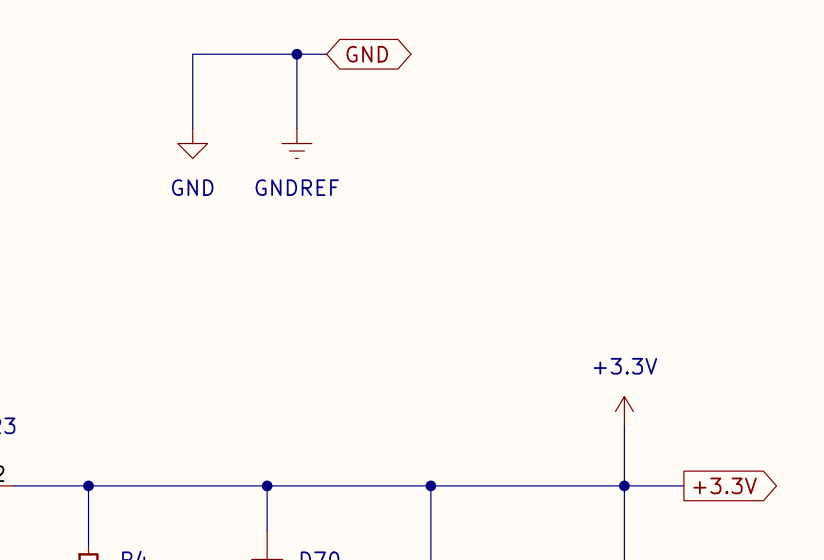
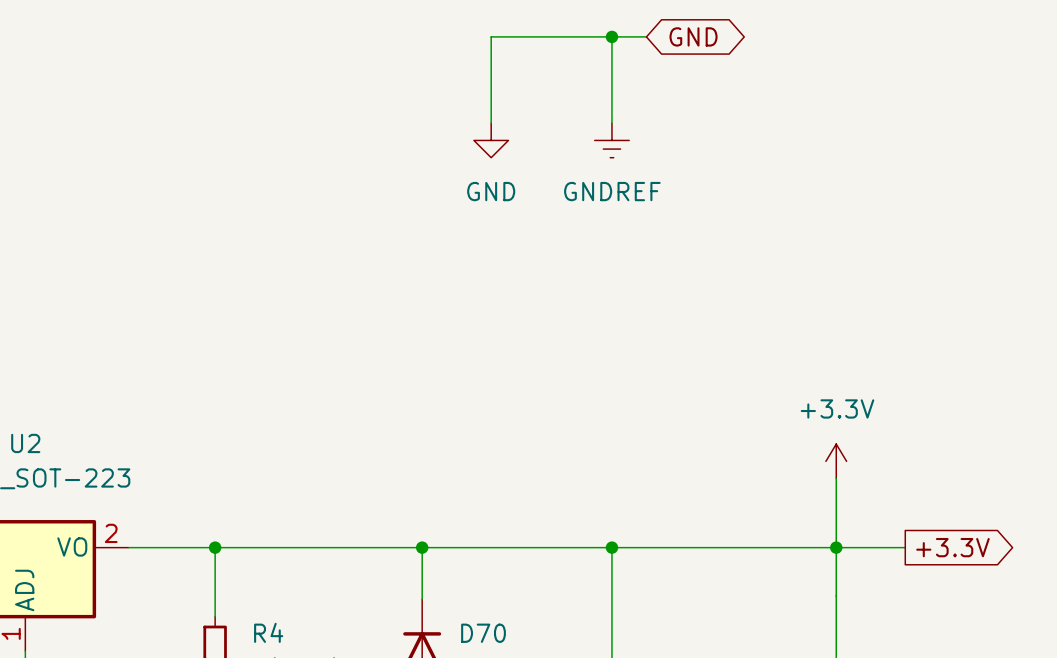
junction: none -> (611, 36)
wire: (296, 54) (296, 128) -> (611, 36) (611, 123)
junction: (296, 54) -> none
wire: (326, 54) (192, 54) (192, 128) -> (646, 36) (491, 36) (491, 123)
global label position: GND (367, 54) -> GND (693, 36)
power symbol position: GND (192, 143) -> GND (491, 140)
power symbol position: GNDREF (296, 143) -> GNDREF (611, 140)

